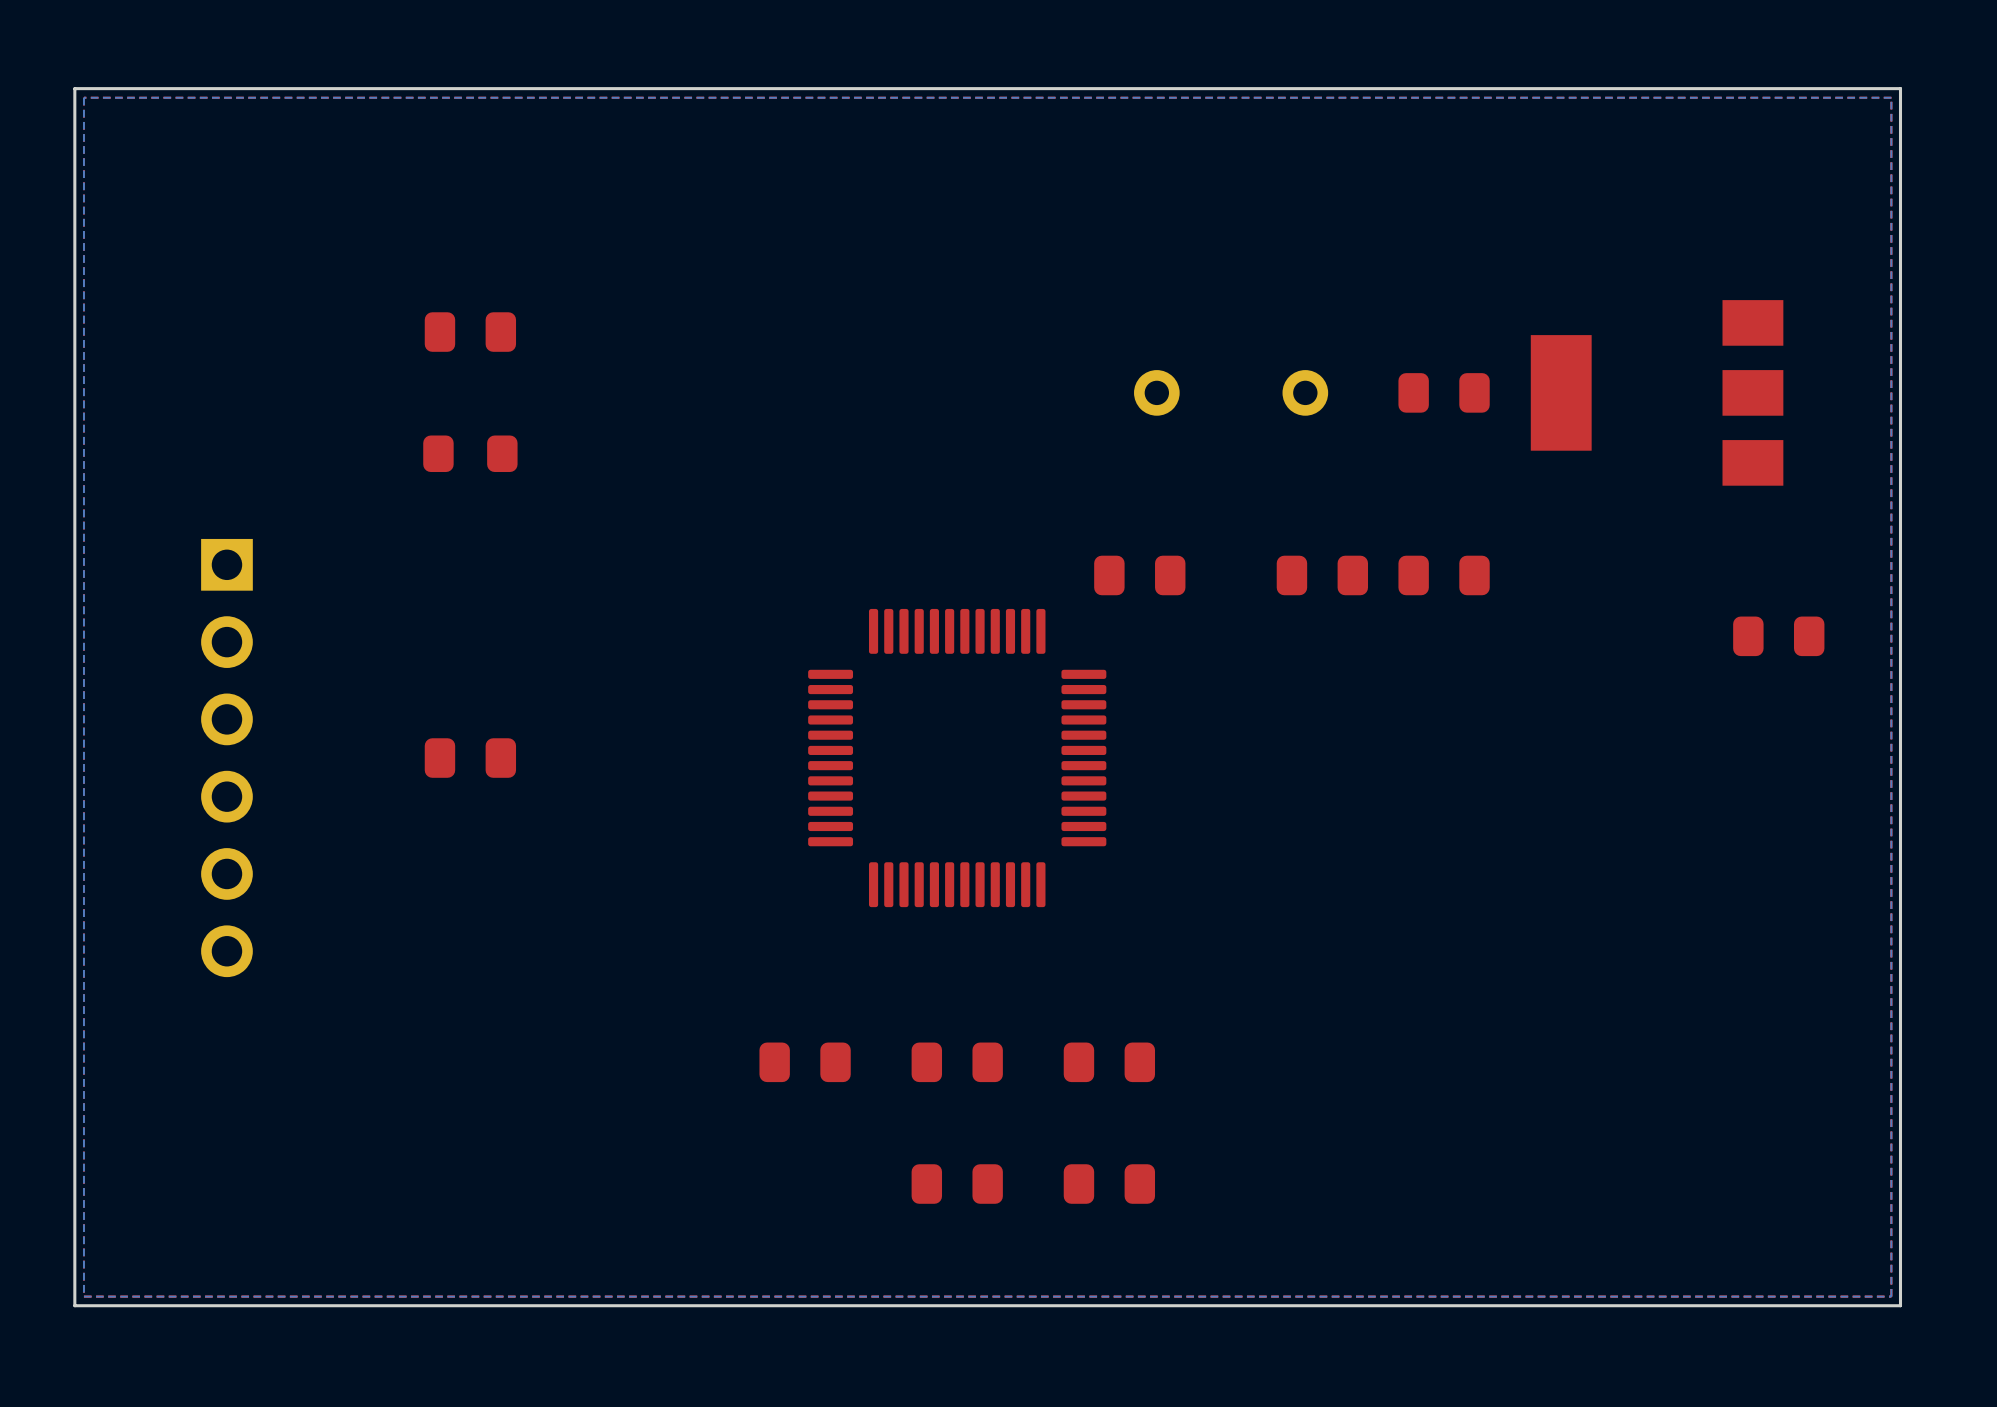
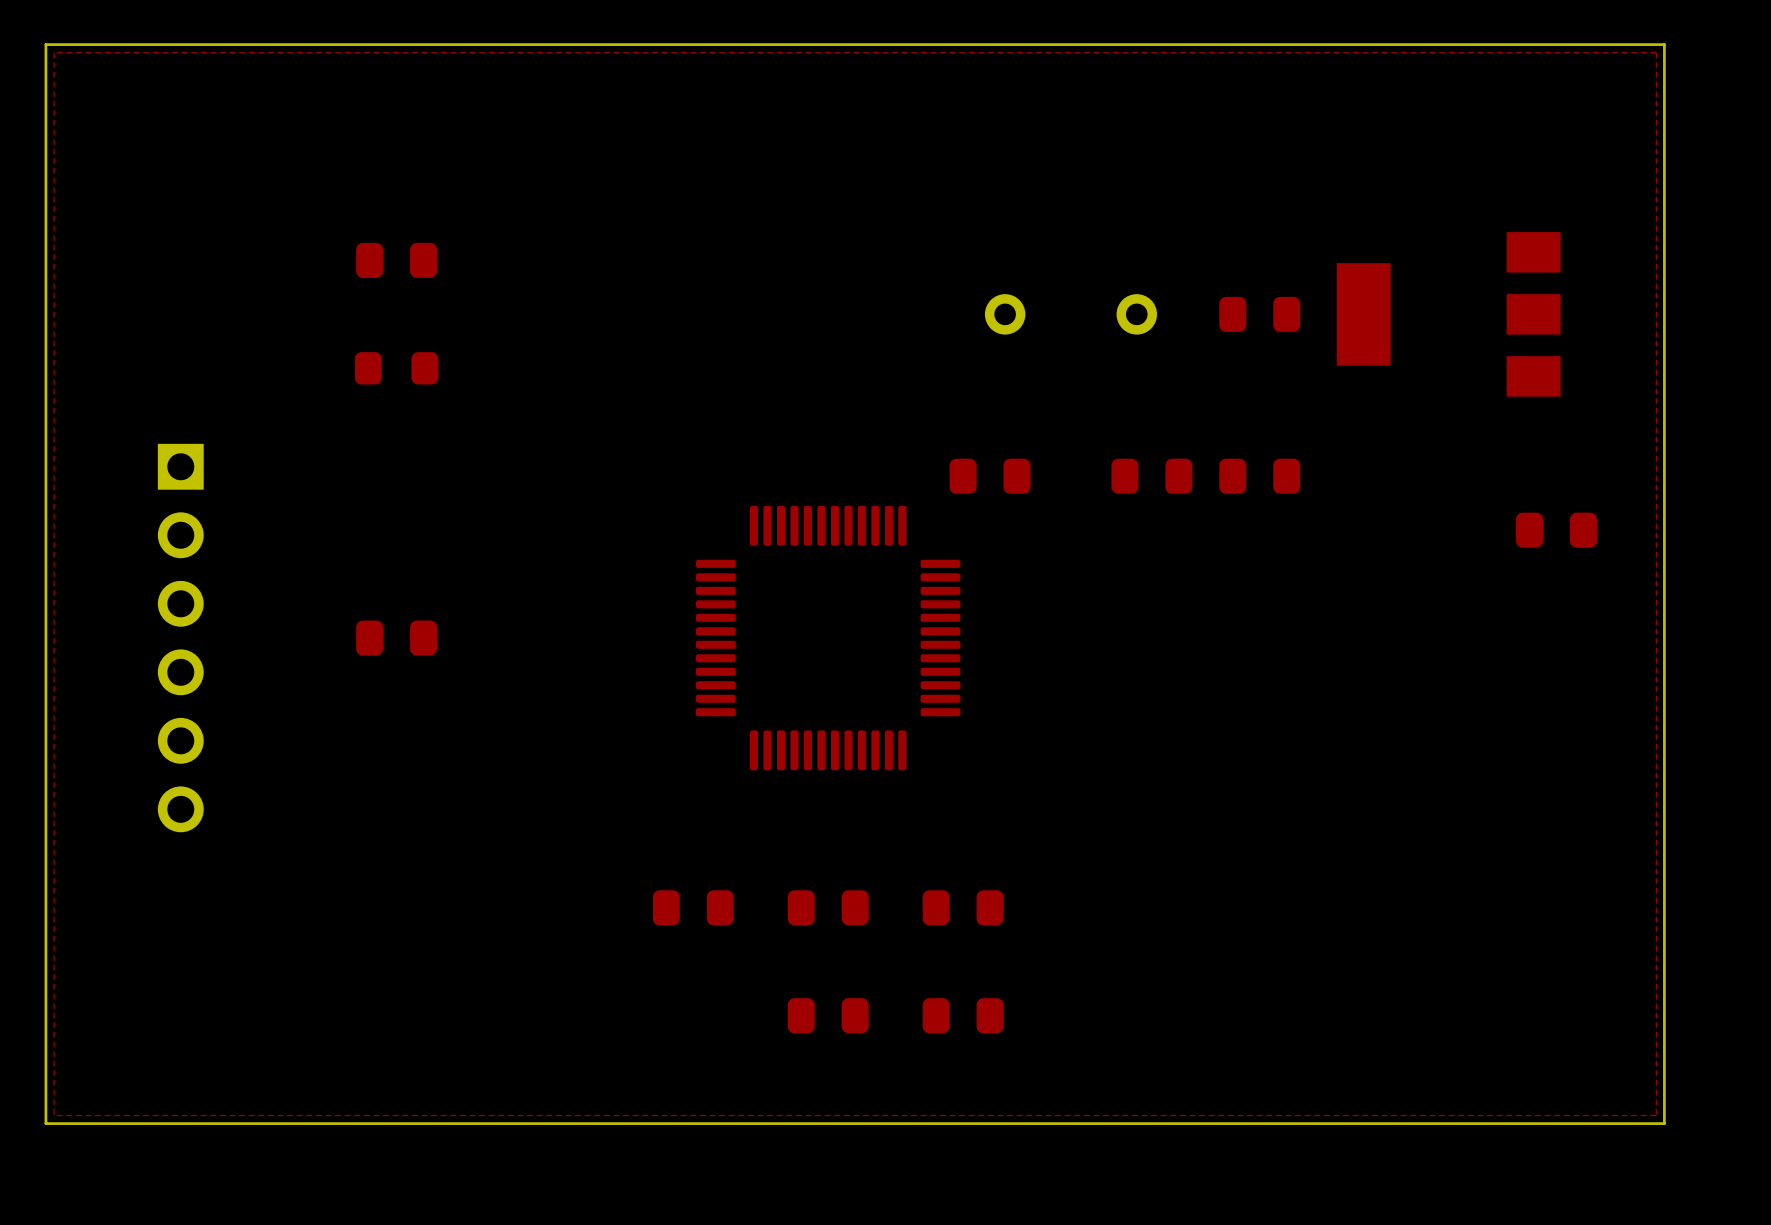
bottom zone outline: (1891, 97) (83, 97) (83, 1296) (1891, 1296) (1891, 97) -> none

